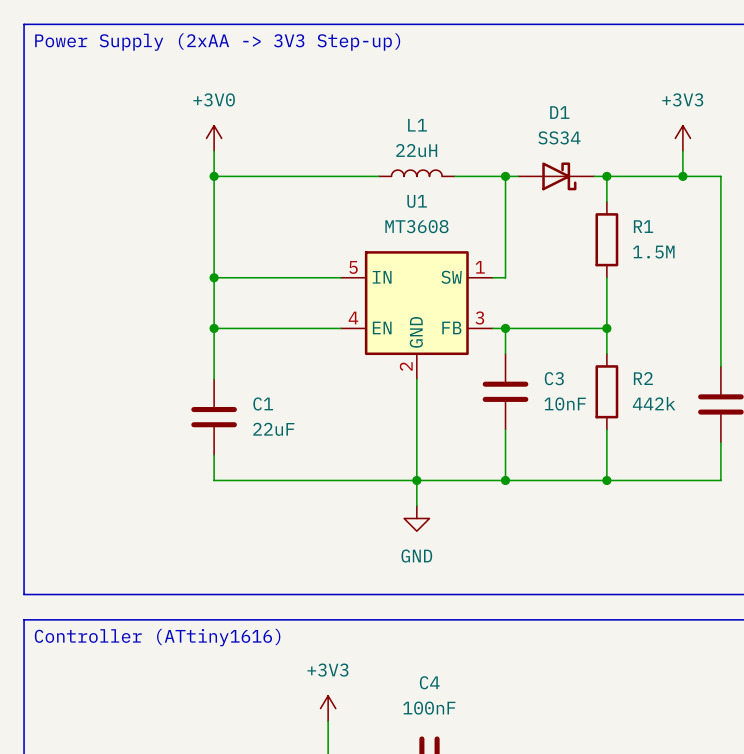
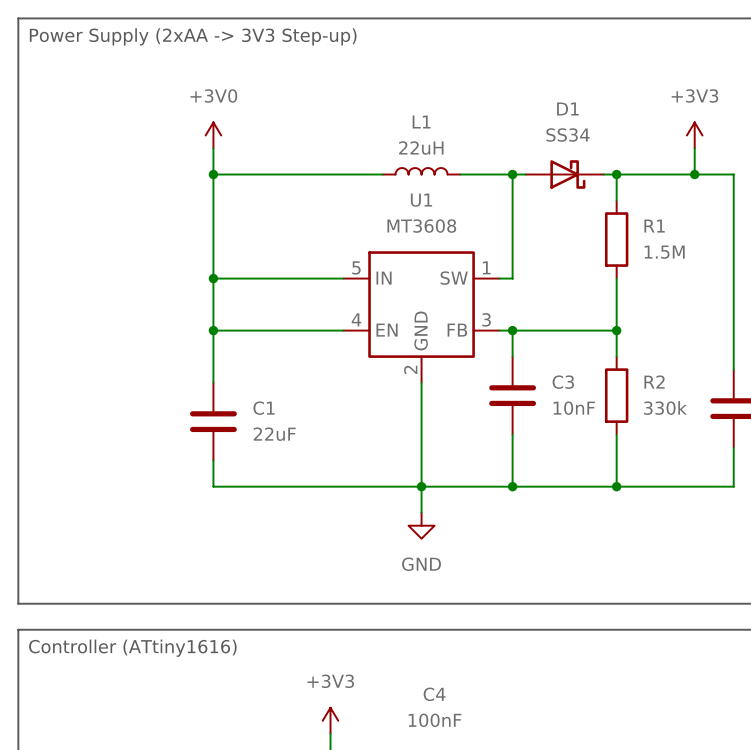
R2 value: 442k (654, 403) -> 330k (665, 408)

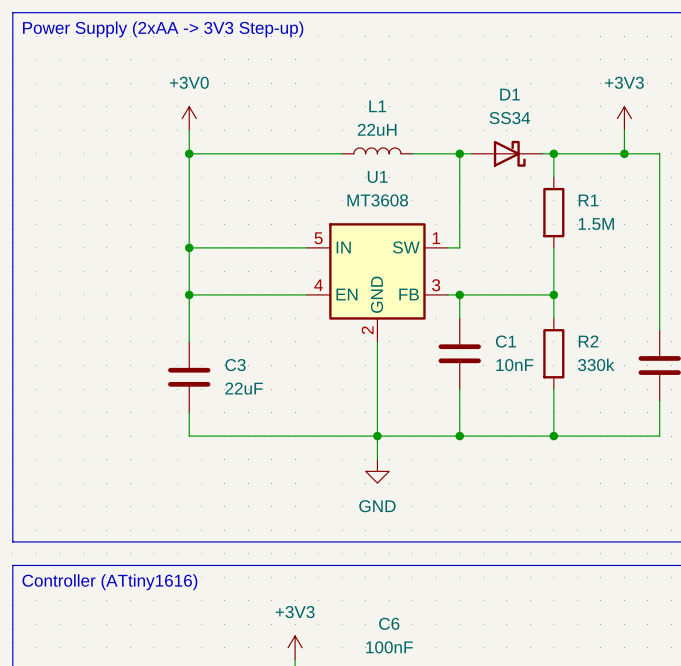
C3 name: C3 (563, 382) -> C1 (505, 341)
C1 name: C1 (264, 408) -> C3 (235, 365)
C4 name: C4 (434, 694) -> C6 (389, 623)

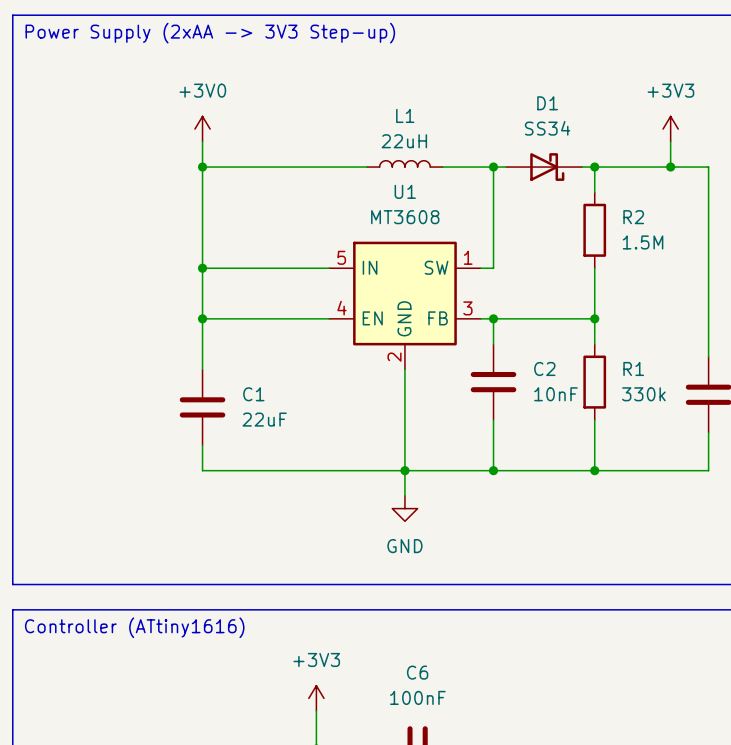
R1 name: R1 (588, 200) -> R2 (633, 217)
C1 name: C1 (505, 341) -> C2 (544, 368)
R2 name: R2 (588, 341) -> R1 (633, 368)
C3 name: C3 (235, 365) -> C1 (253, 394)

